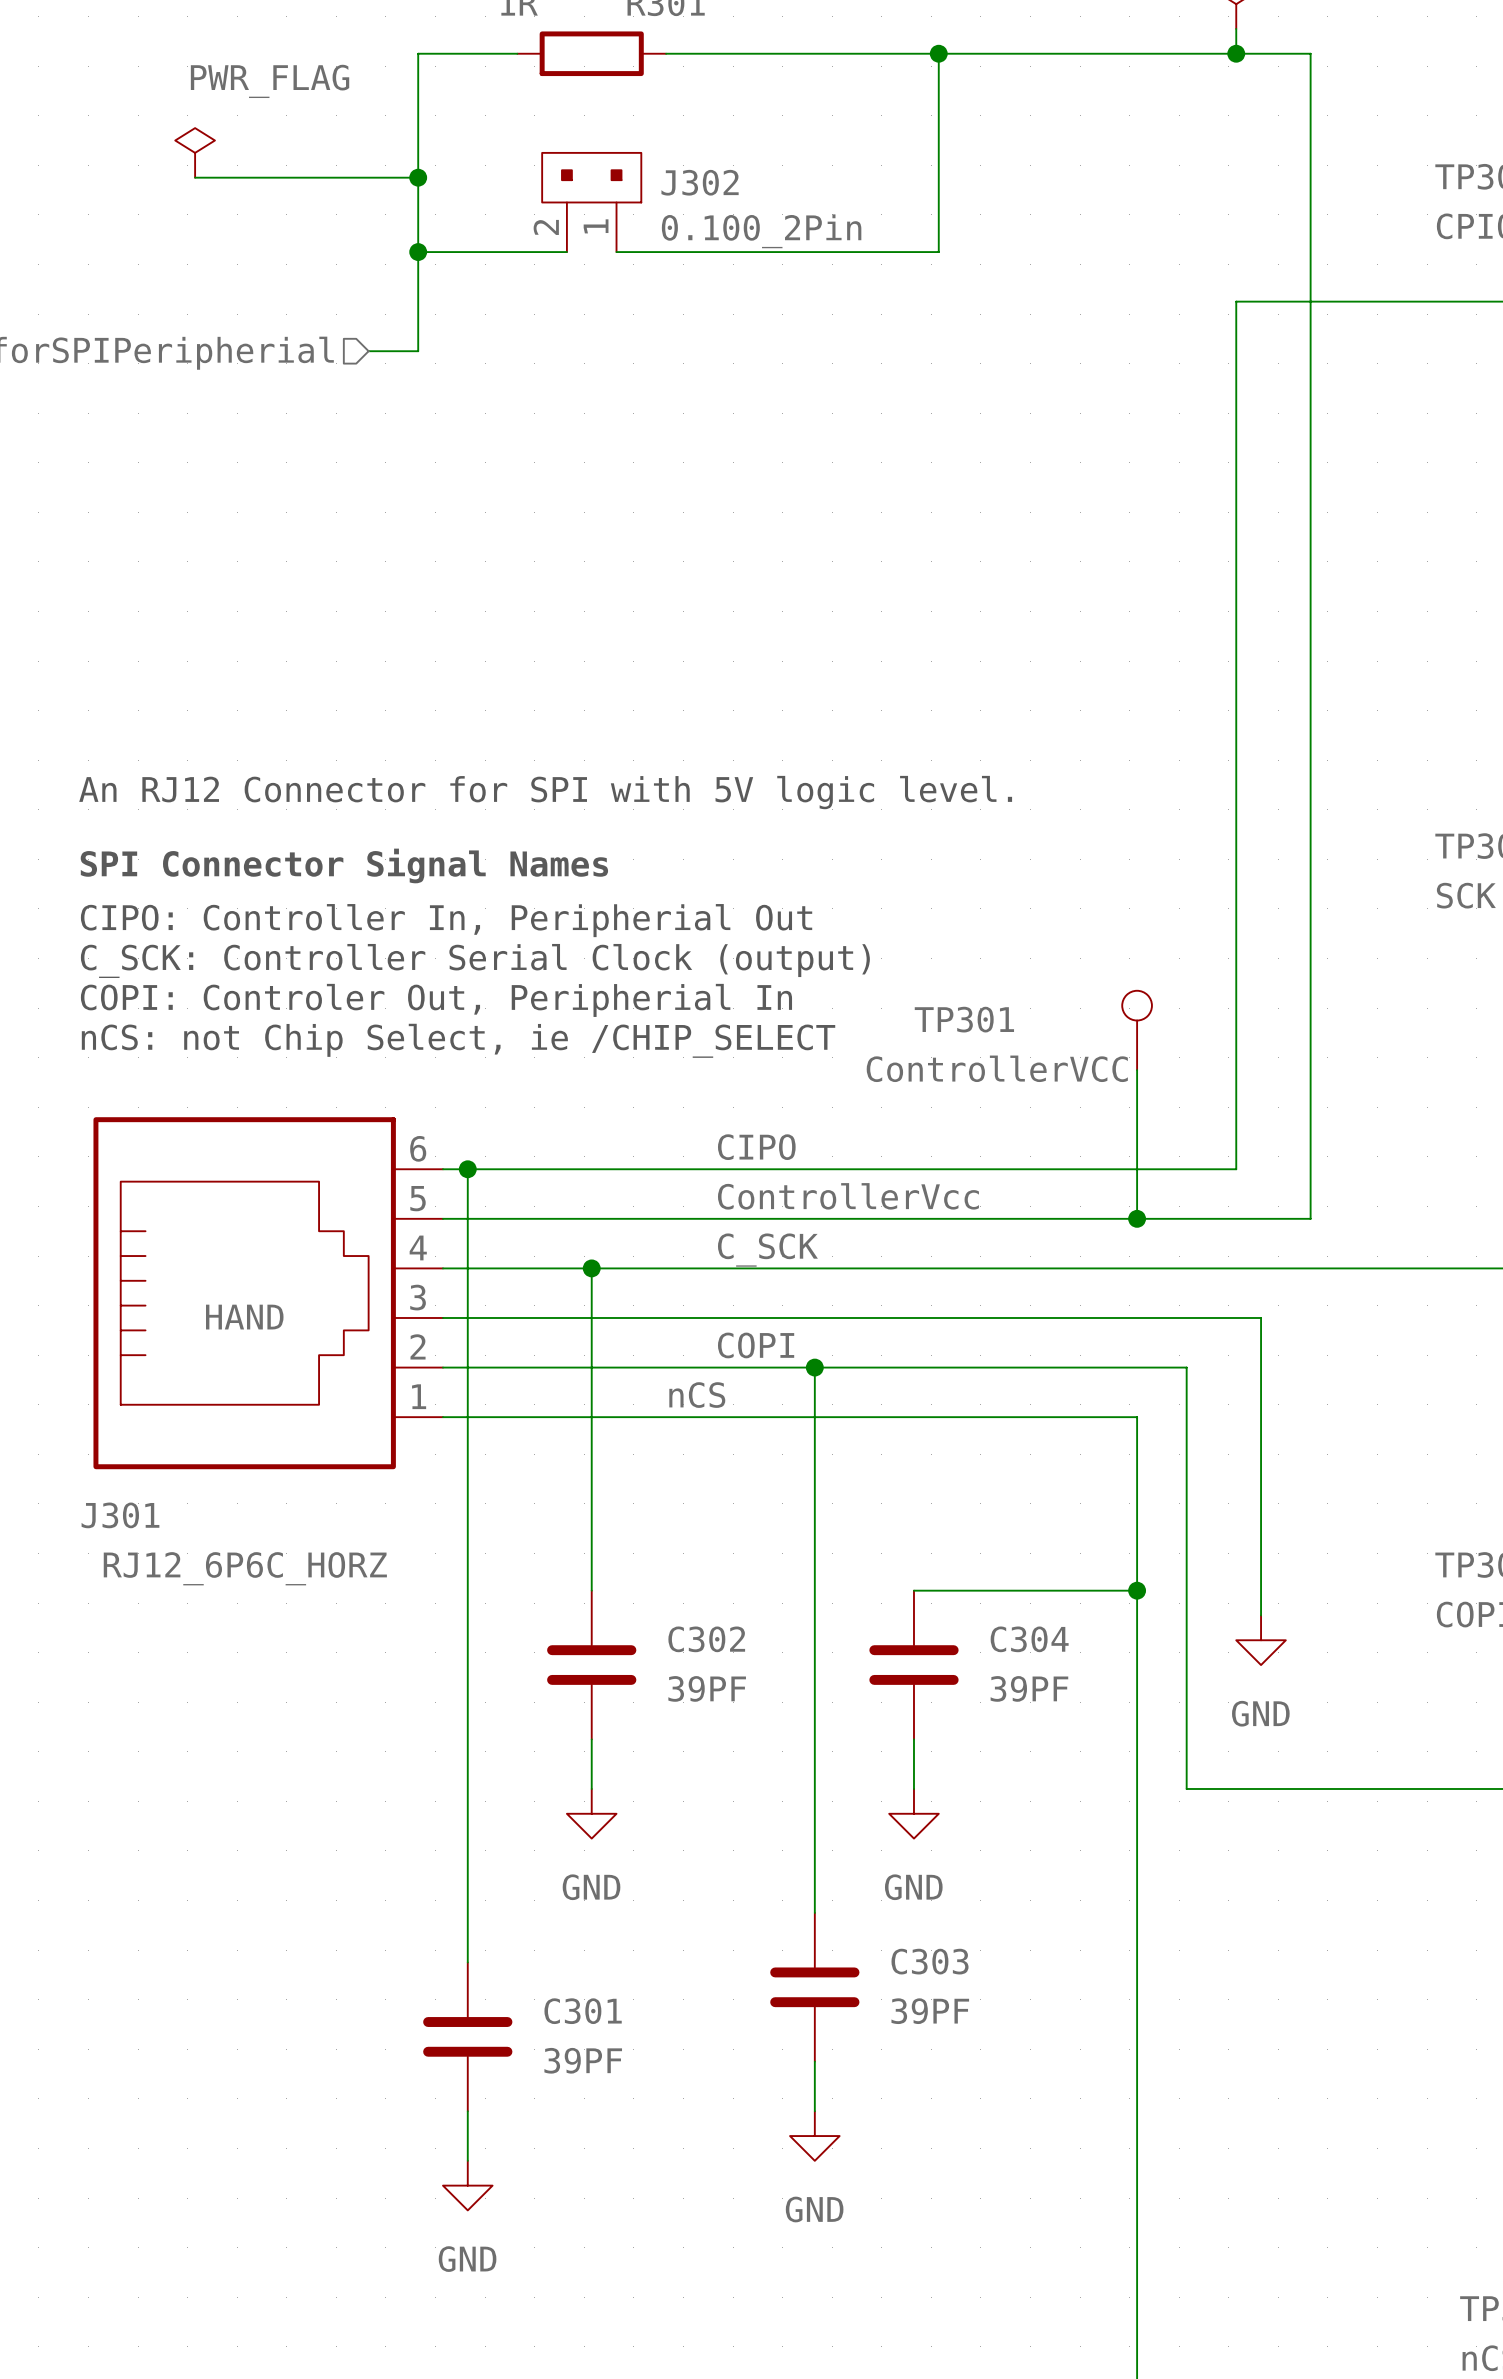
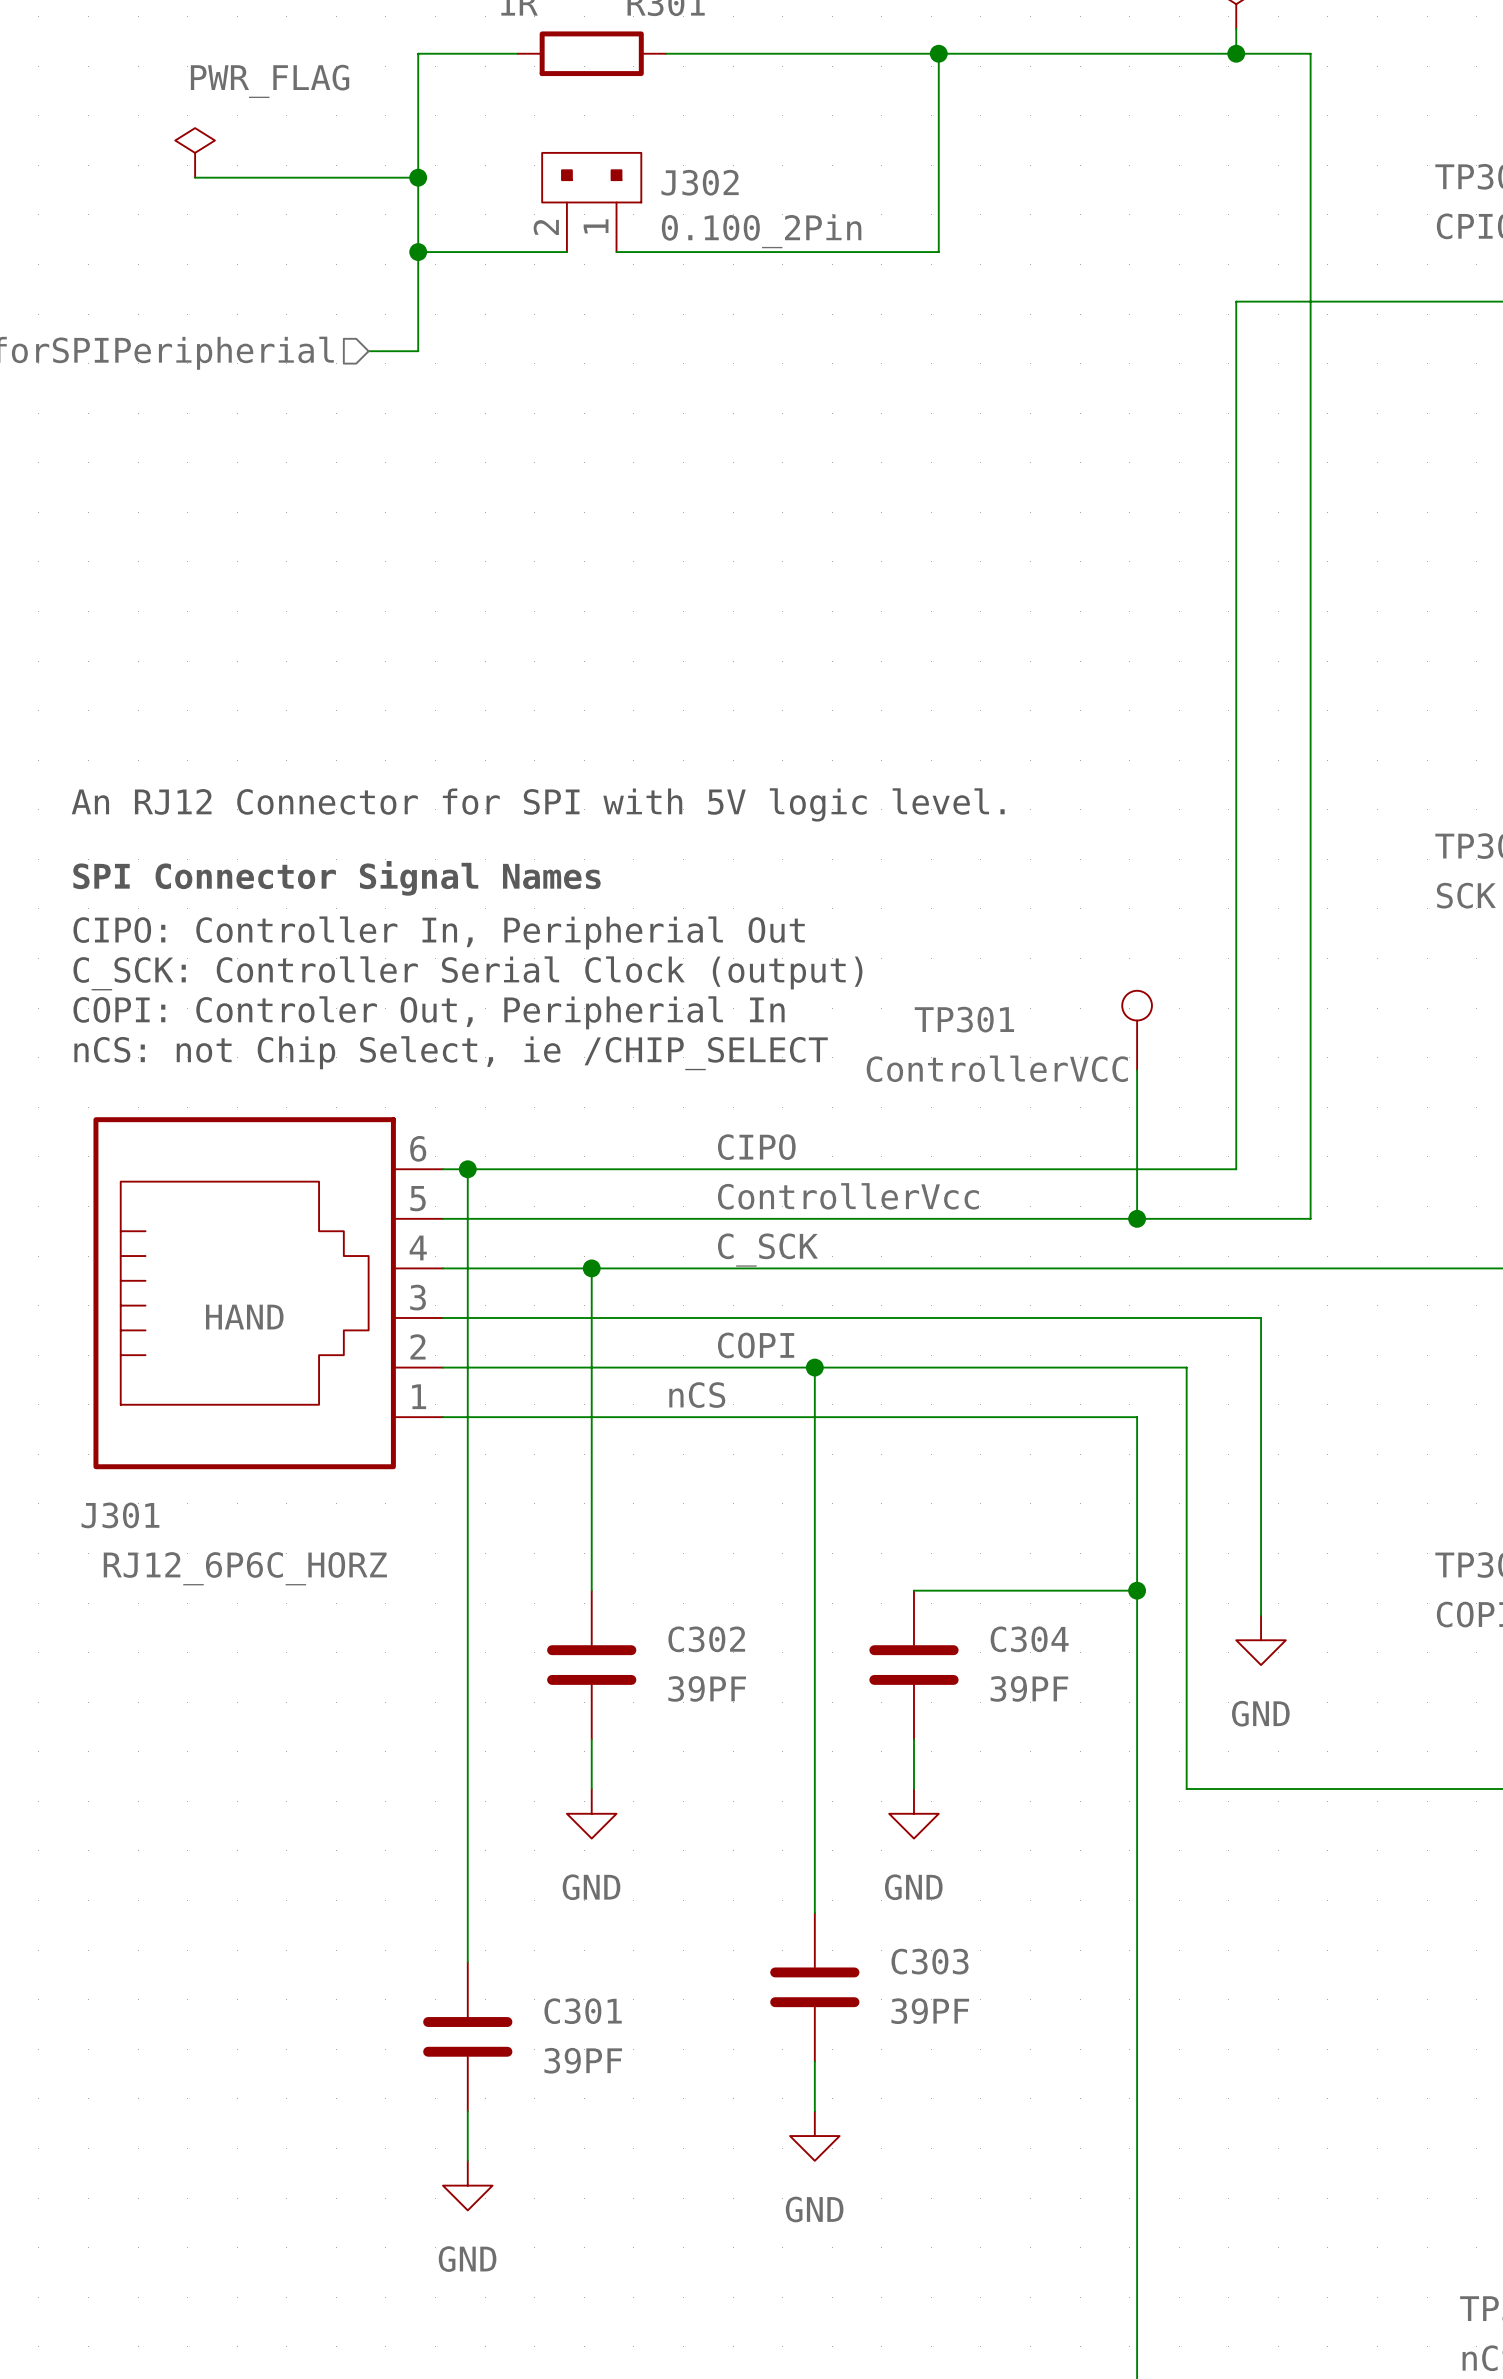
text position: An RJ12 Connector for SPI with 5V logic level. (545, 792) -> An RJ12 Connector for SPI with 5V logic level. (538, 804)
text position: SPI Connector Signal Names (344, 865) -> SPI Connector Signal Names (336, 878)
text position: CIPO: Controller In, Peripherial Out (446, 920) -> CIPO: Controller In, Peripherial Out (439, 932)
text position: C_SCK: Controller Serial Clock (output) (475, 960) -> C_SCK: Controller Serial Clock (output) (467, 973)
text position: COPI: Controler Out, Peripherial In (436, 1000) -> COPI: Controler Out, Peripherial In (429, 1012)
text position: nCS: not Chip Select, ie /CHIP_SELECT (458, 1040) -> nCS: not Chip Select, ie /CHIP_SELECT (451, 1053)

